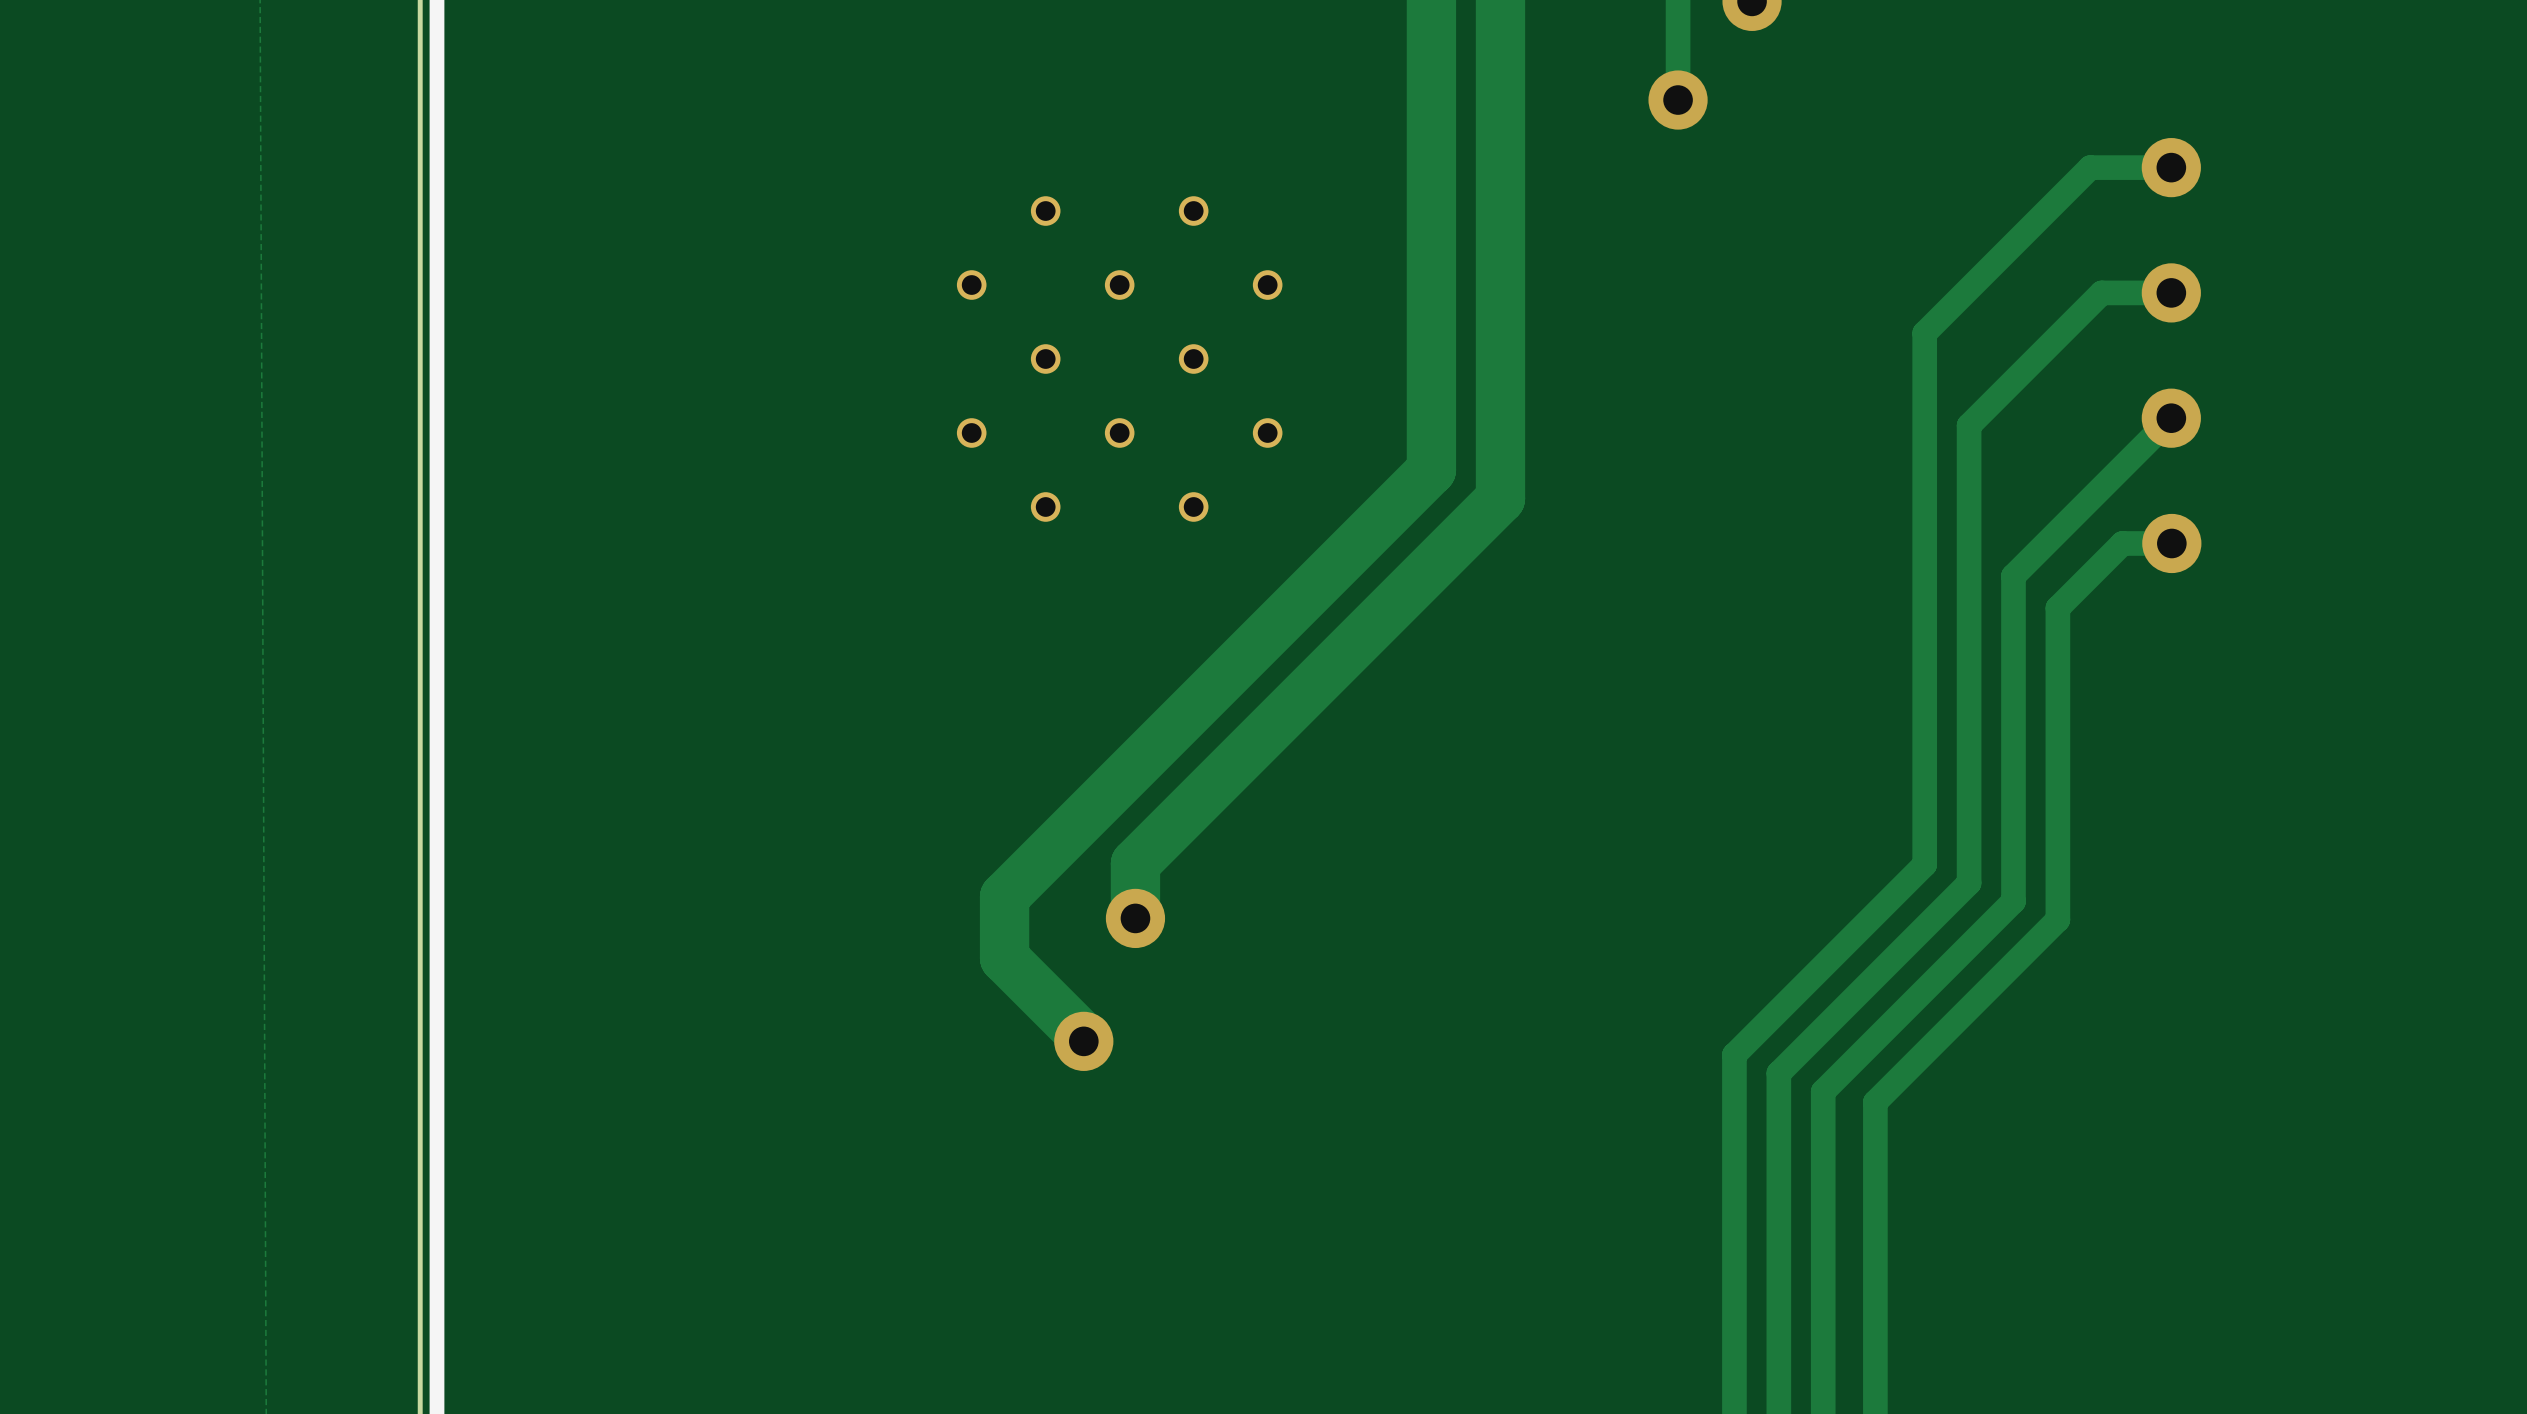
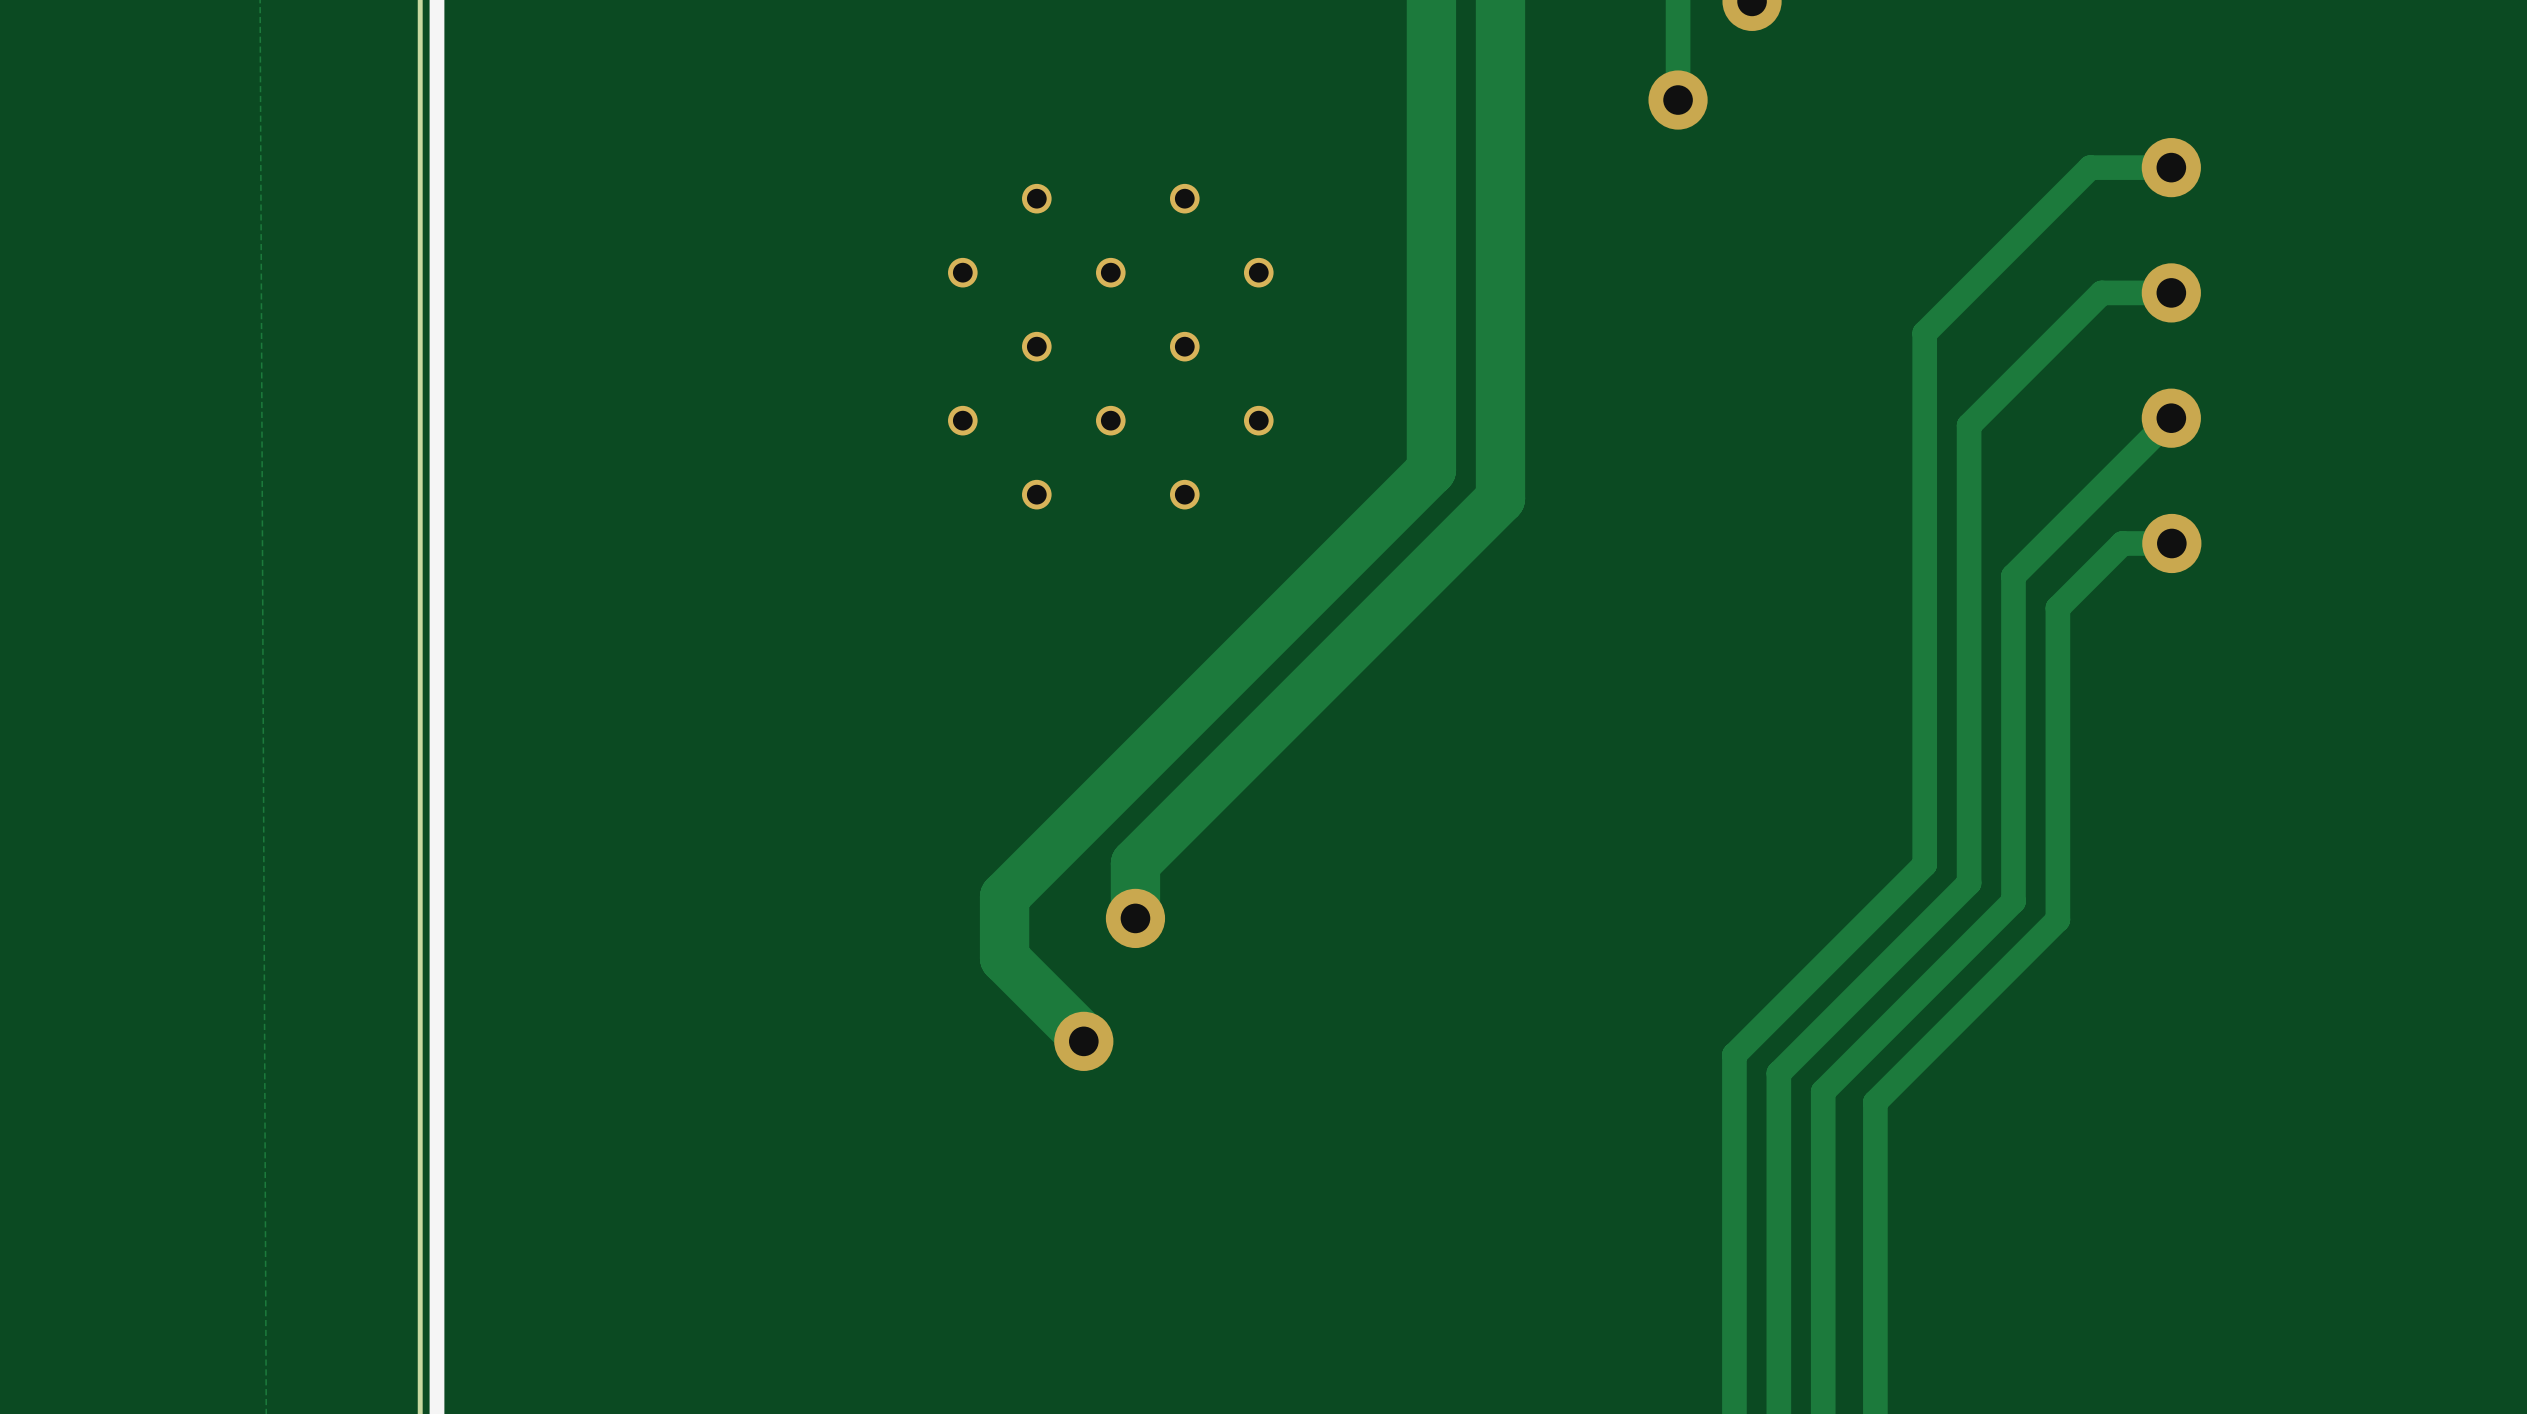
part position: (1119, 359) -> (1110, 346)

